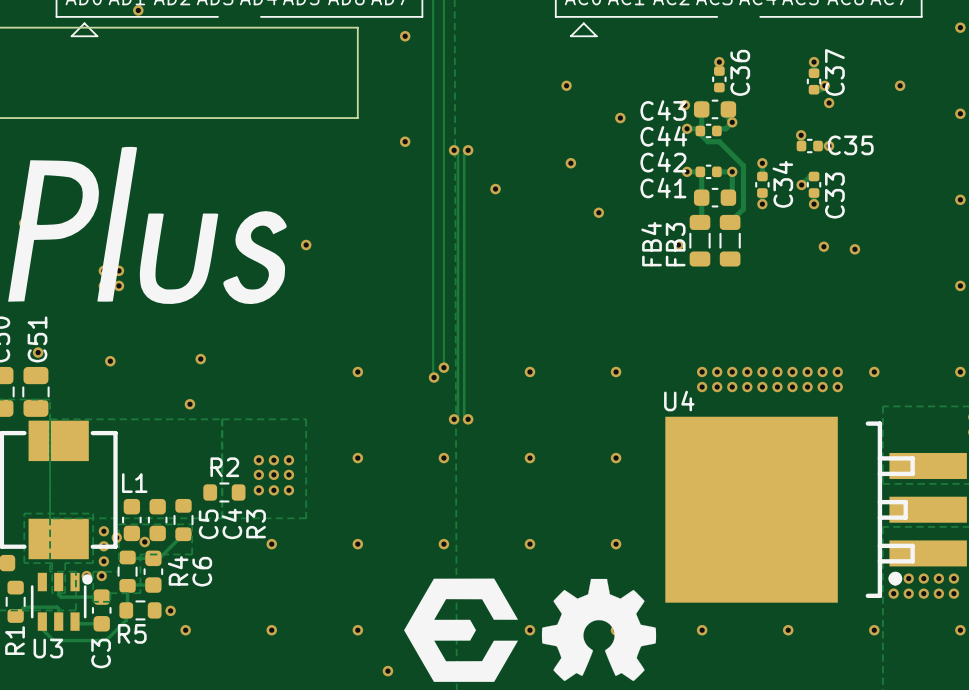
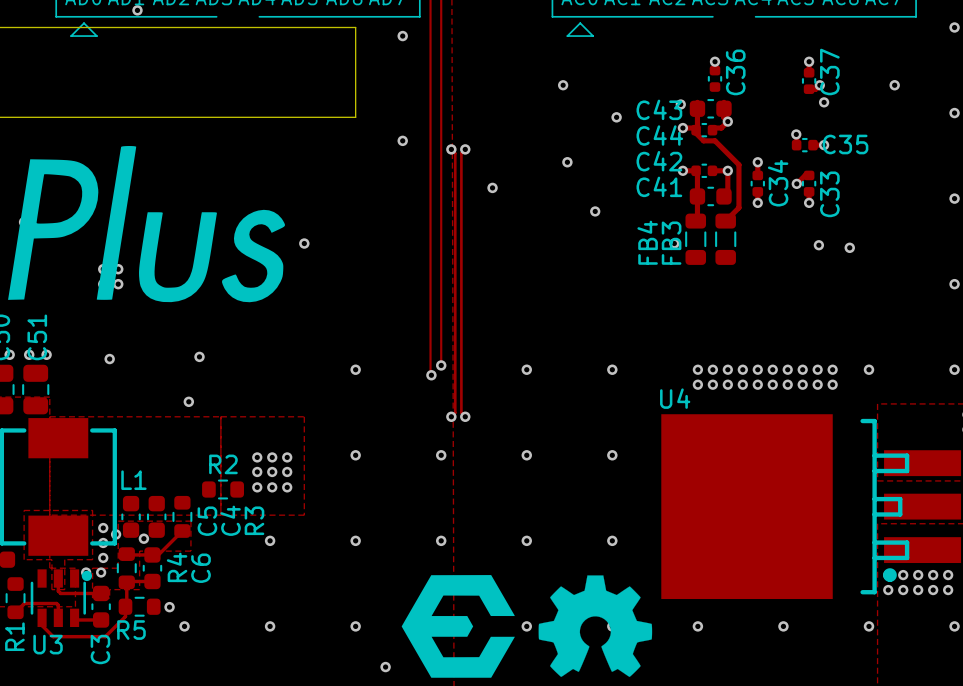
via: (38, 352) -> none
via: none -> (9, 354)
via: none -> (29, 354)
via: none -> (46, 354)

